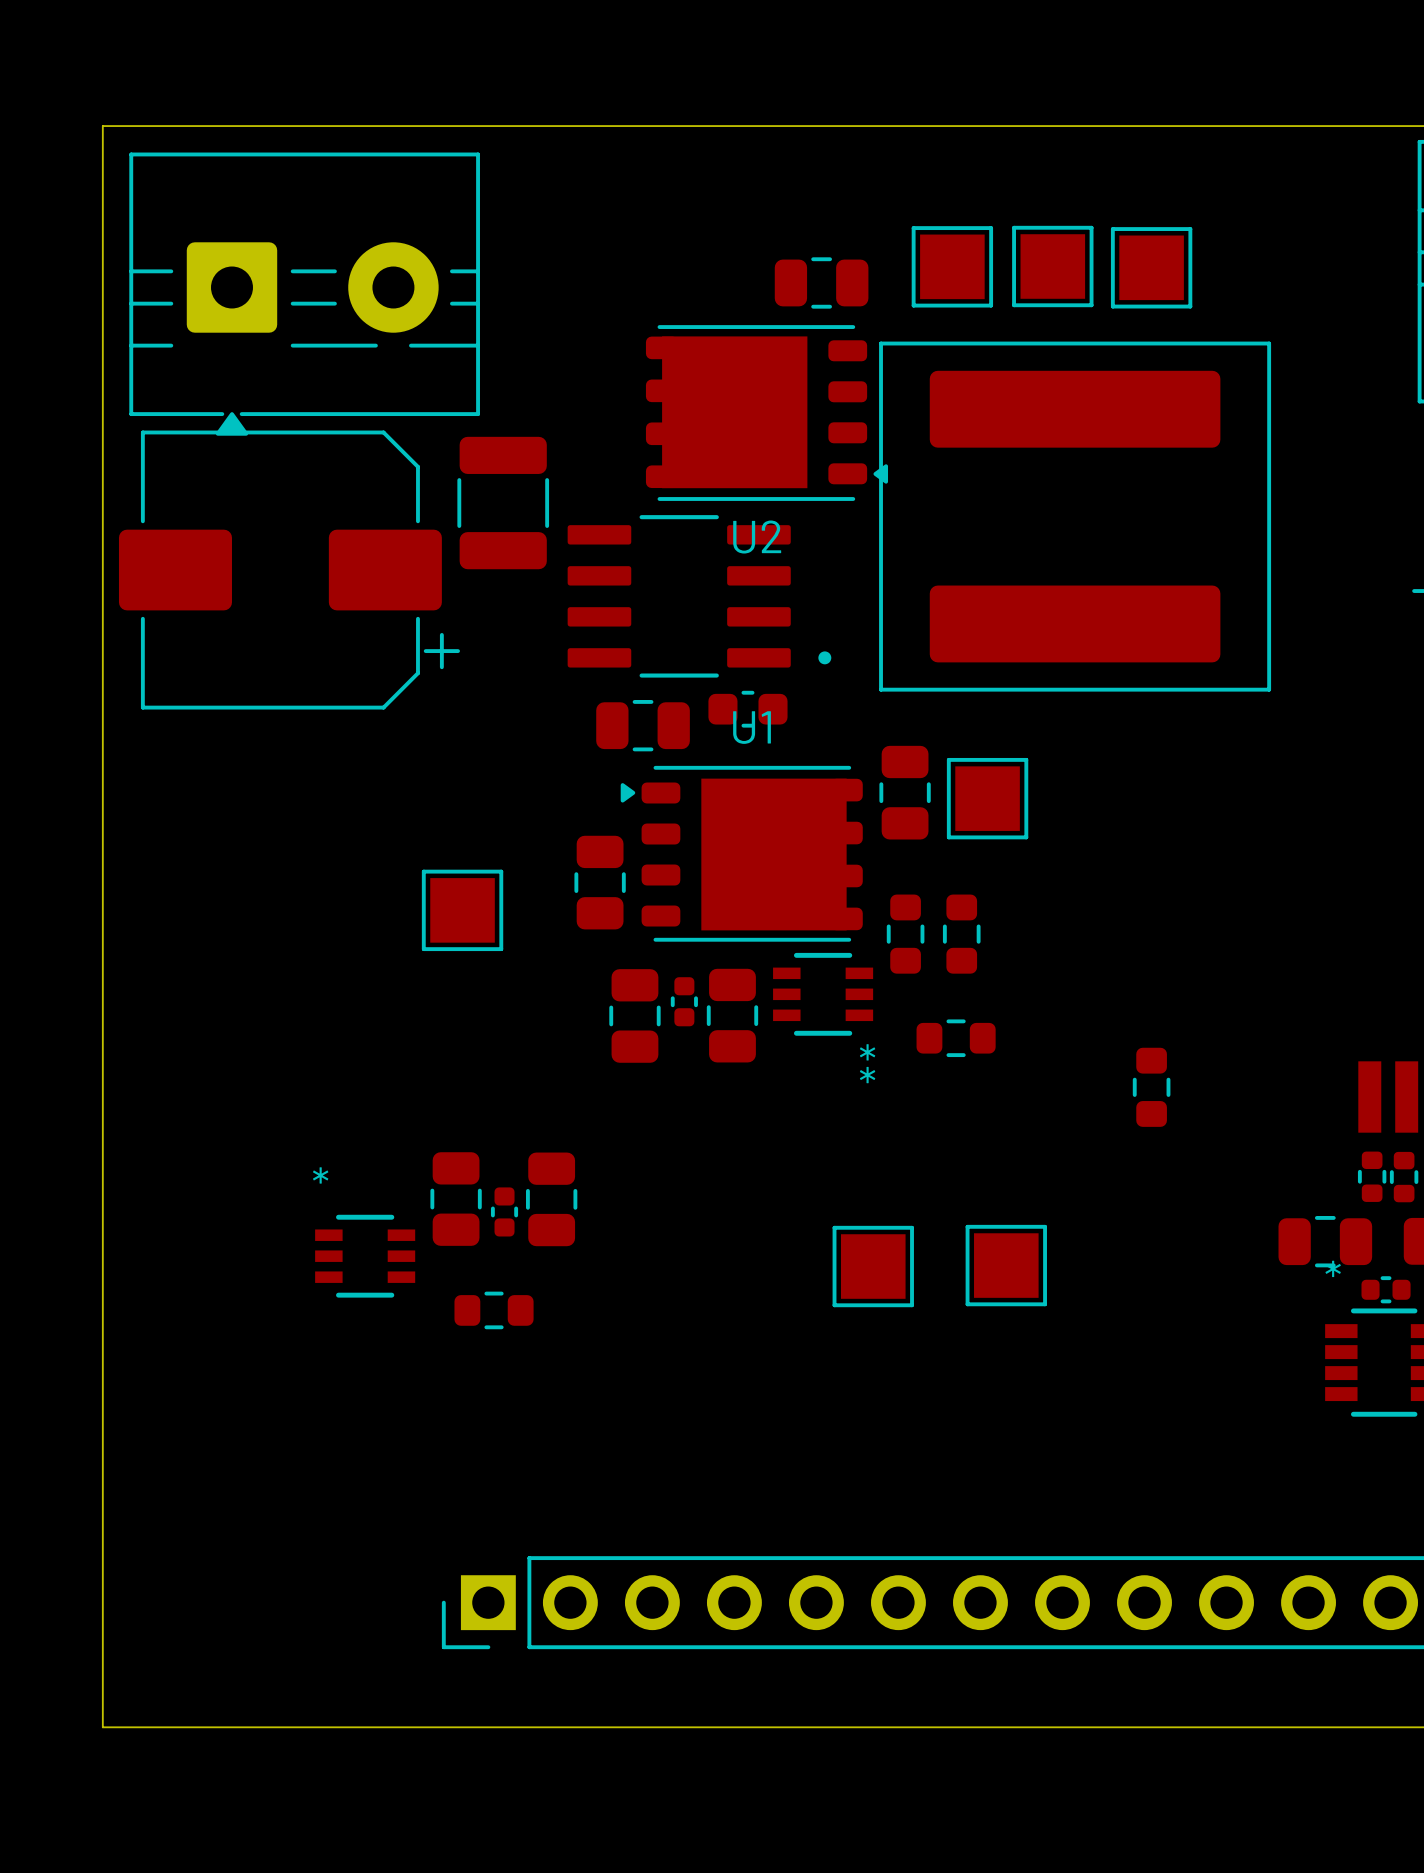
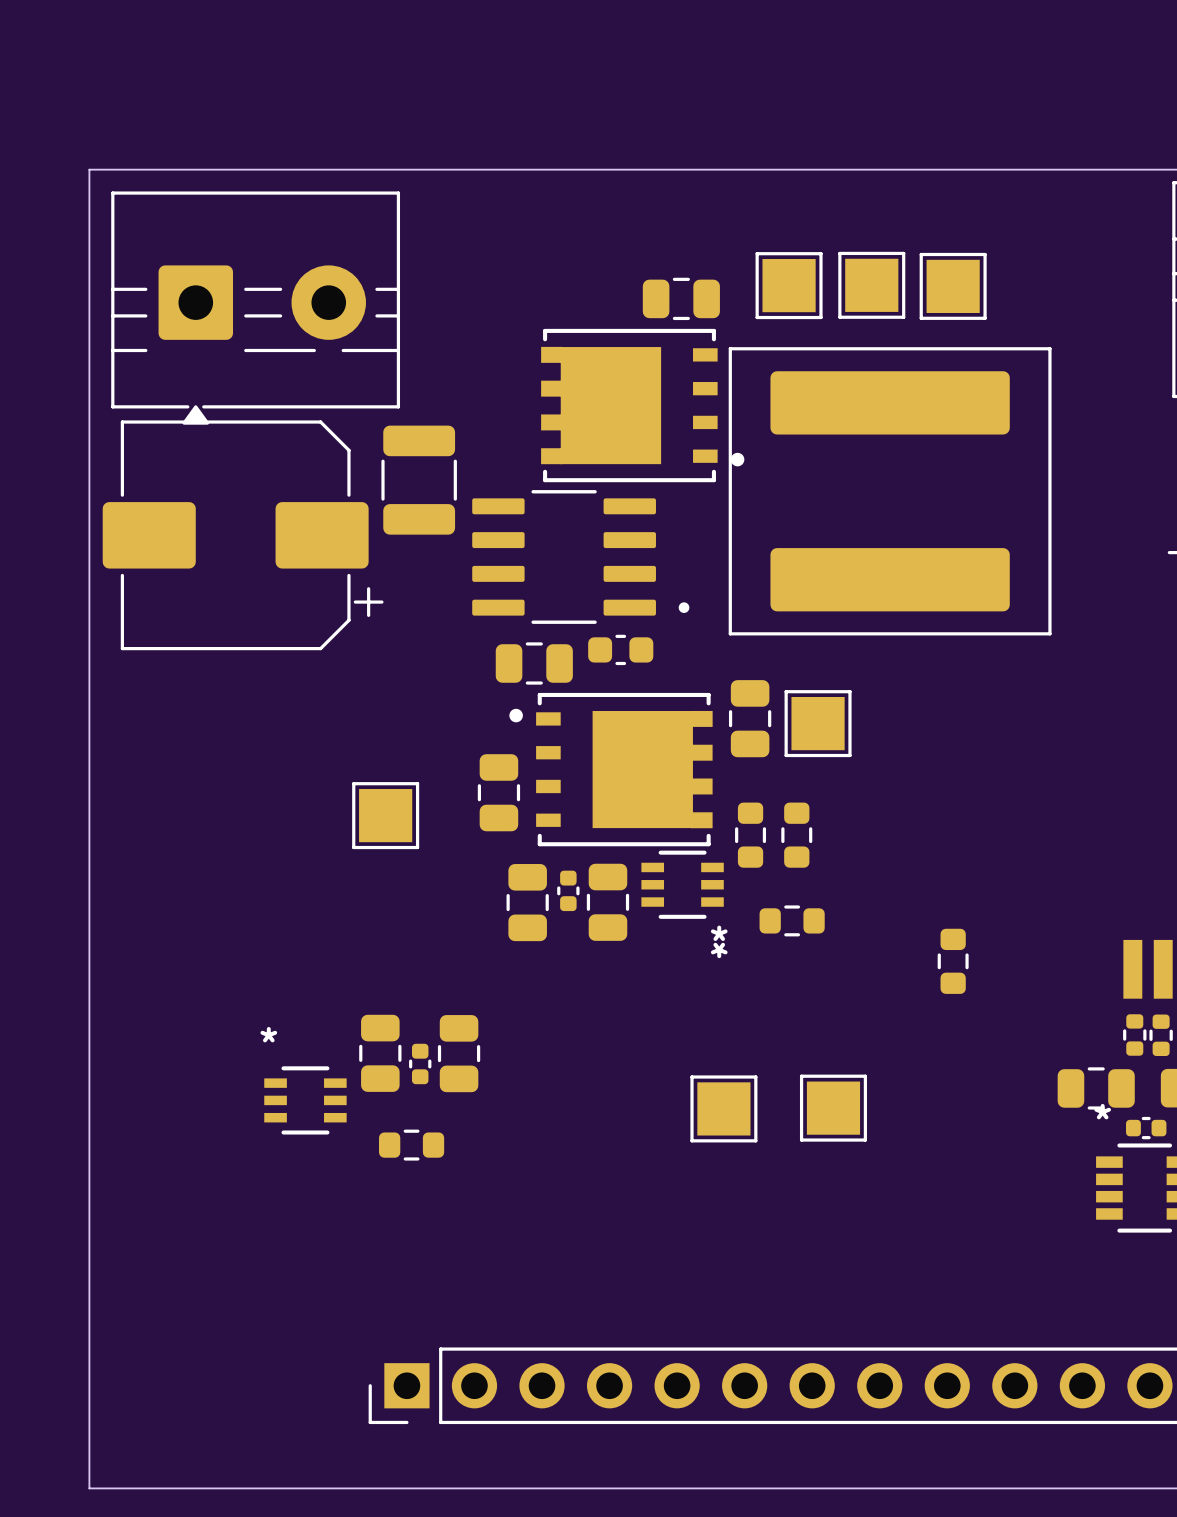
part: none -> (642, 405)
U2: (766, 413) -> none
U1: (741, 853) -> none
part: none -> (611, 769)

